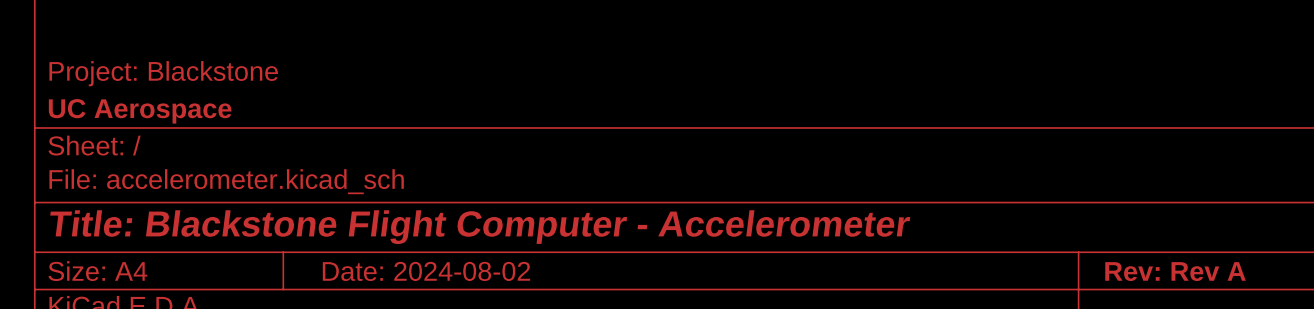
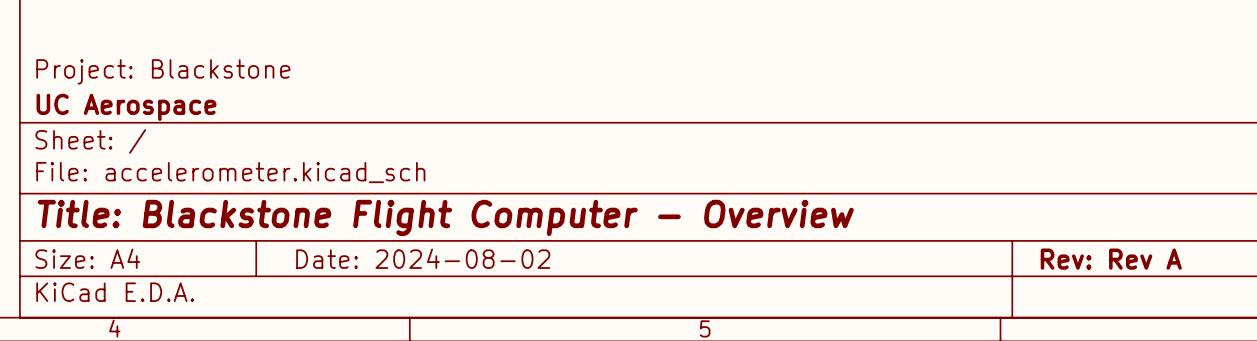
title block: Title: Blackstone Flight Computer - Accelerometer (480, 227) -> Title: Blackstone Flight Computer - Overview (445, 217)

